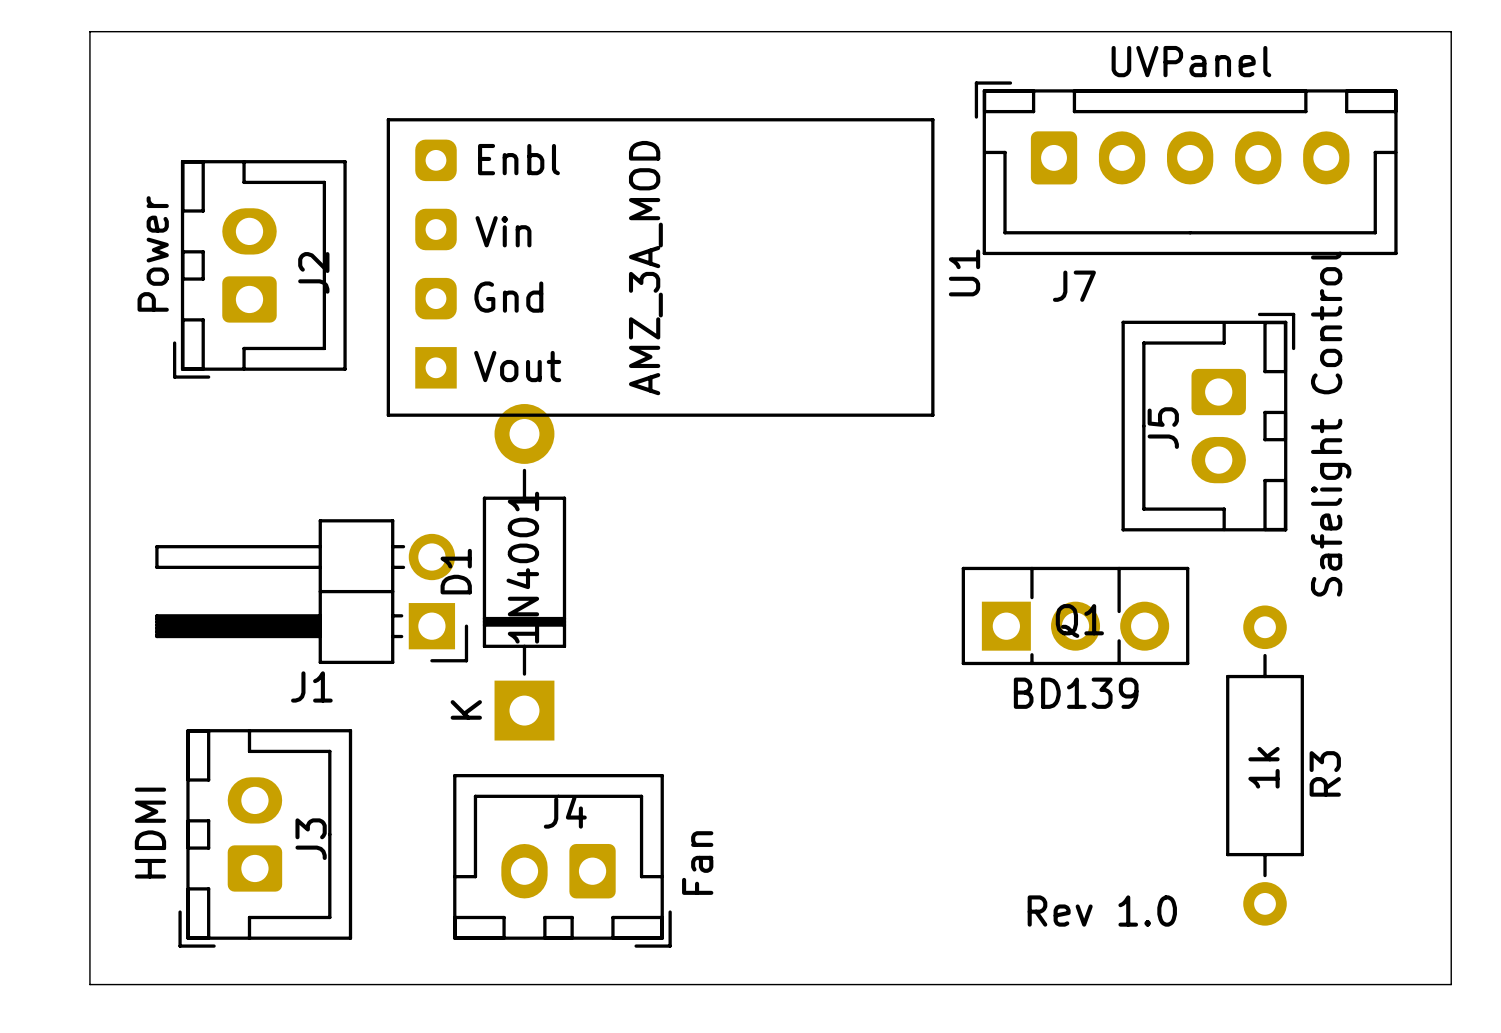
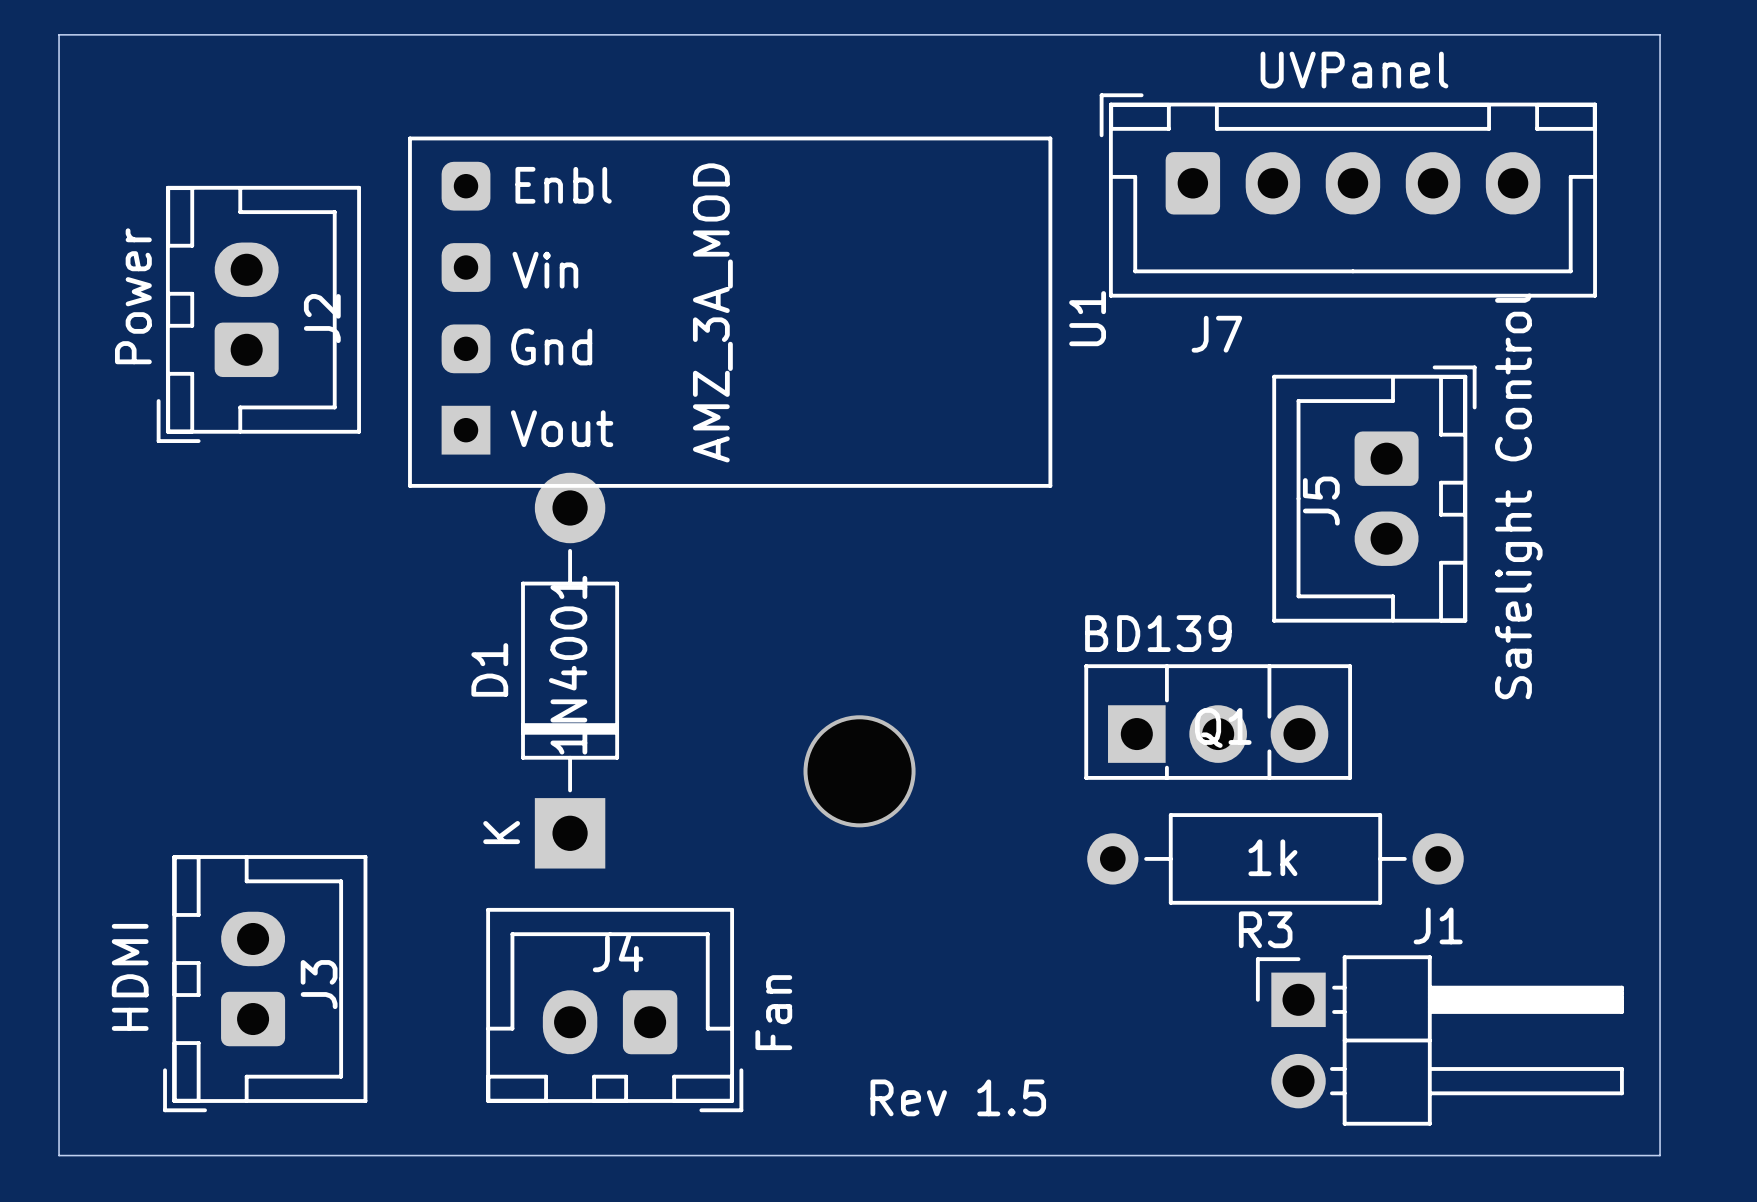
J1 rotation: 0° (311, 591) -> 180° (1439, 1040)
J1 position: (311, 591) -> (1439, 1040)
via: none -> (859, 771)
Q1 value position: BD139 (1076, 693) -> BD139 (1158, 633)
R3 rotation: 0° (1265, 765) -> 90° clockwise (1275, 858)
text: Rev 1.0 (1102, 911) -> none
text: none -> Rev 1.5 (958, 1097)

